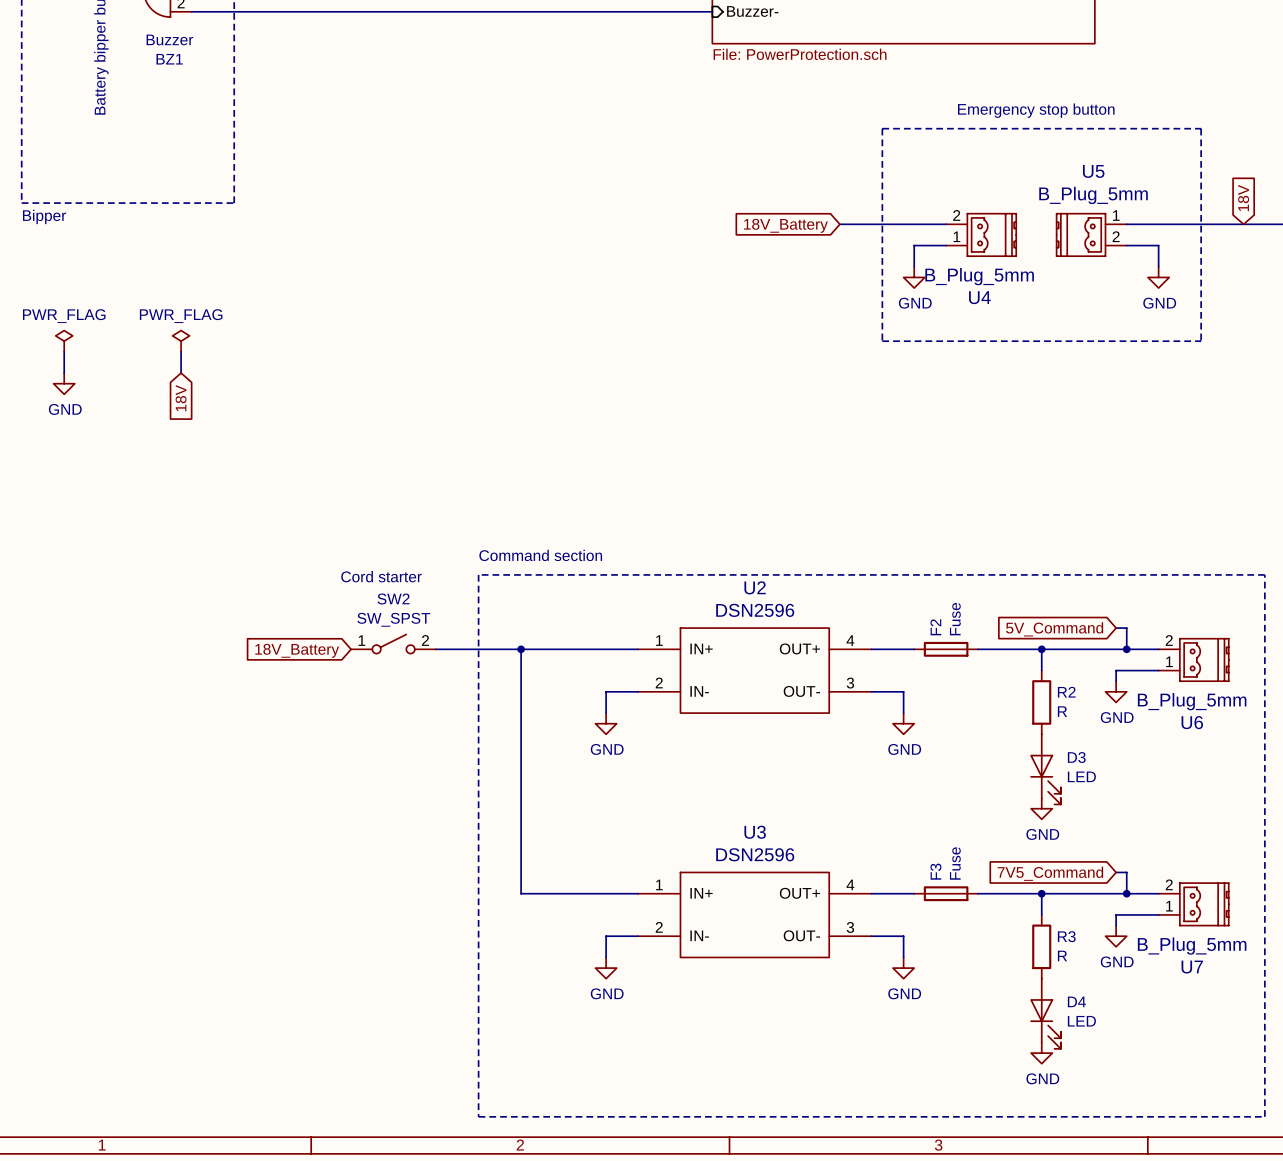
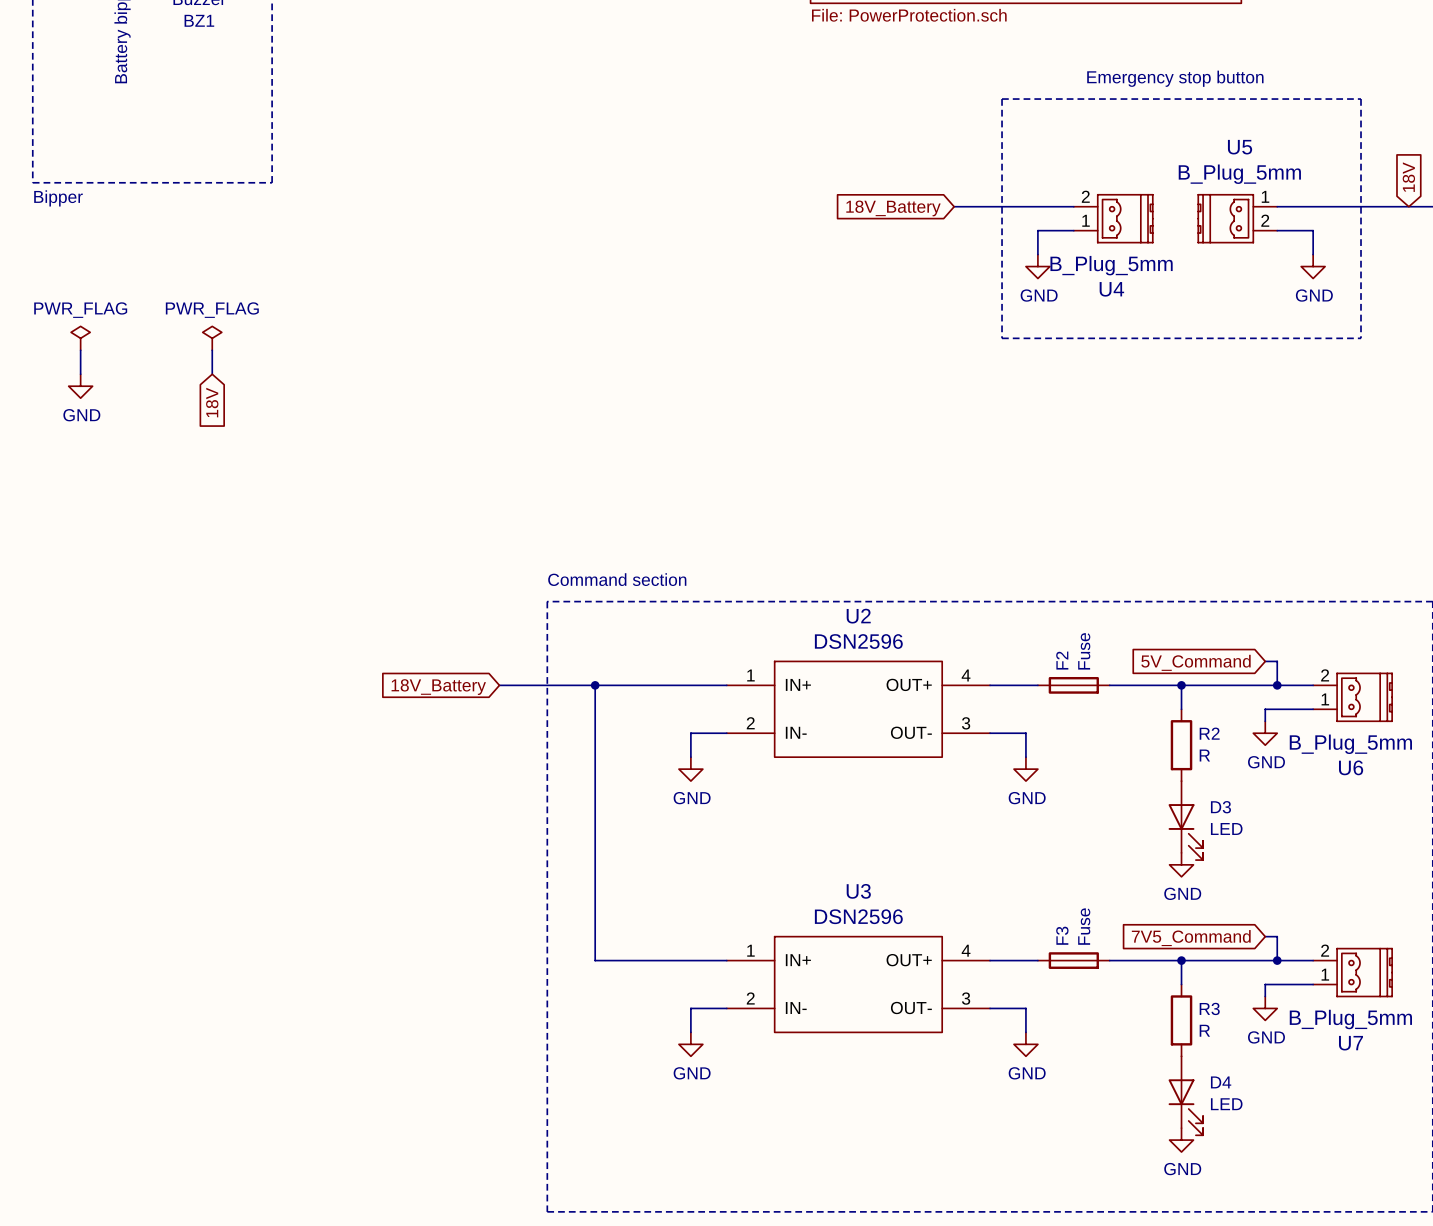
text: Cord starter (381, 576) -> none
SW2: SW_SPST (393, 644) -> none
global label position: 18V_Battery (297, 650) -> 18V_Battery (438, 687)

